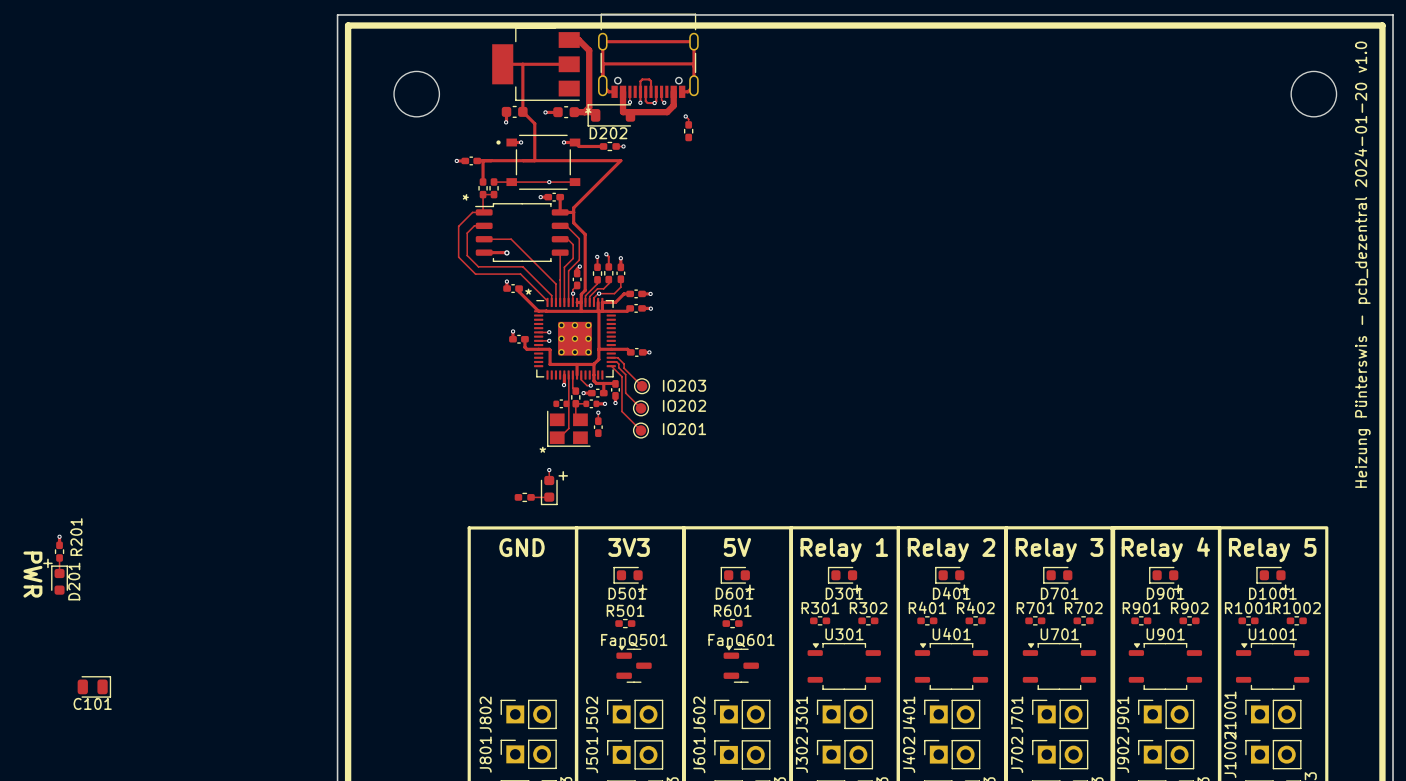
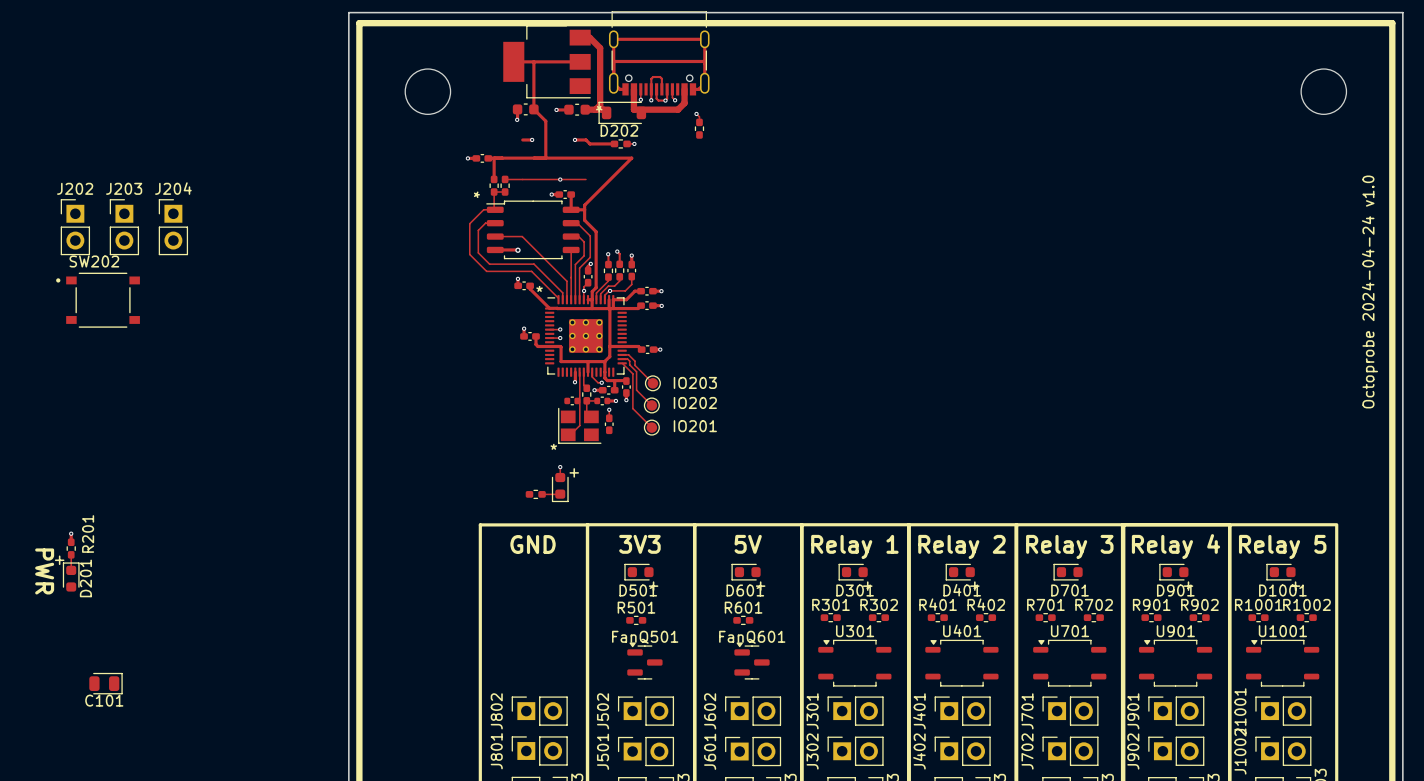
part: (538, 162) -> none
J202: none -> (75, 227)
J203: none -> (124, 227)
J204: none -> (173, 227)
text: Heizung Pünterswis - pcb_dezentral 2024-01-20 v1.0 (1362, 264) -> none
text: none -> Octoprobe 2024-04-24 v1.0 (1369, 291)
SW202: none -> (98, 300)

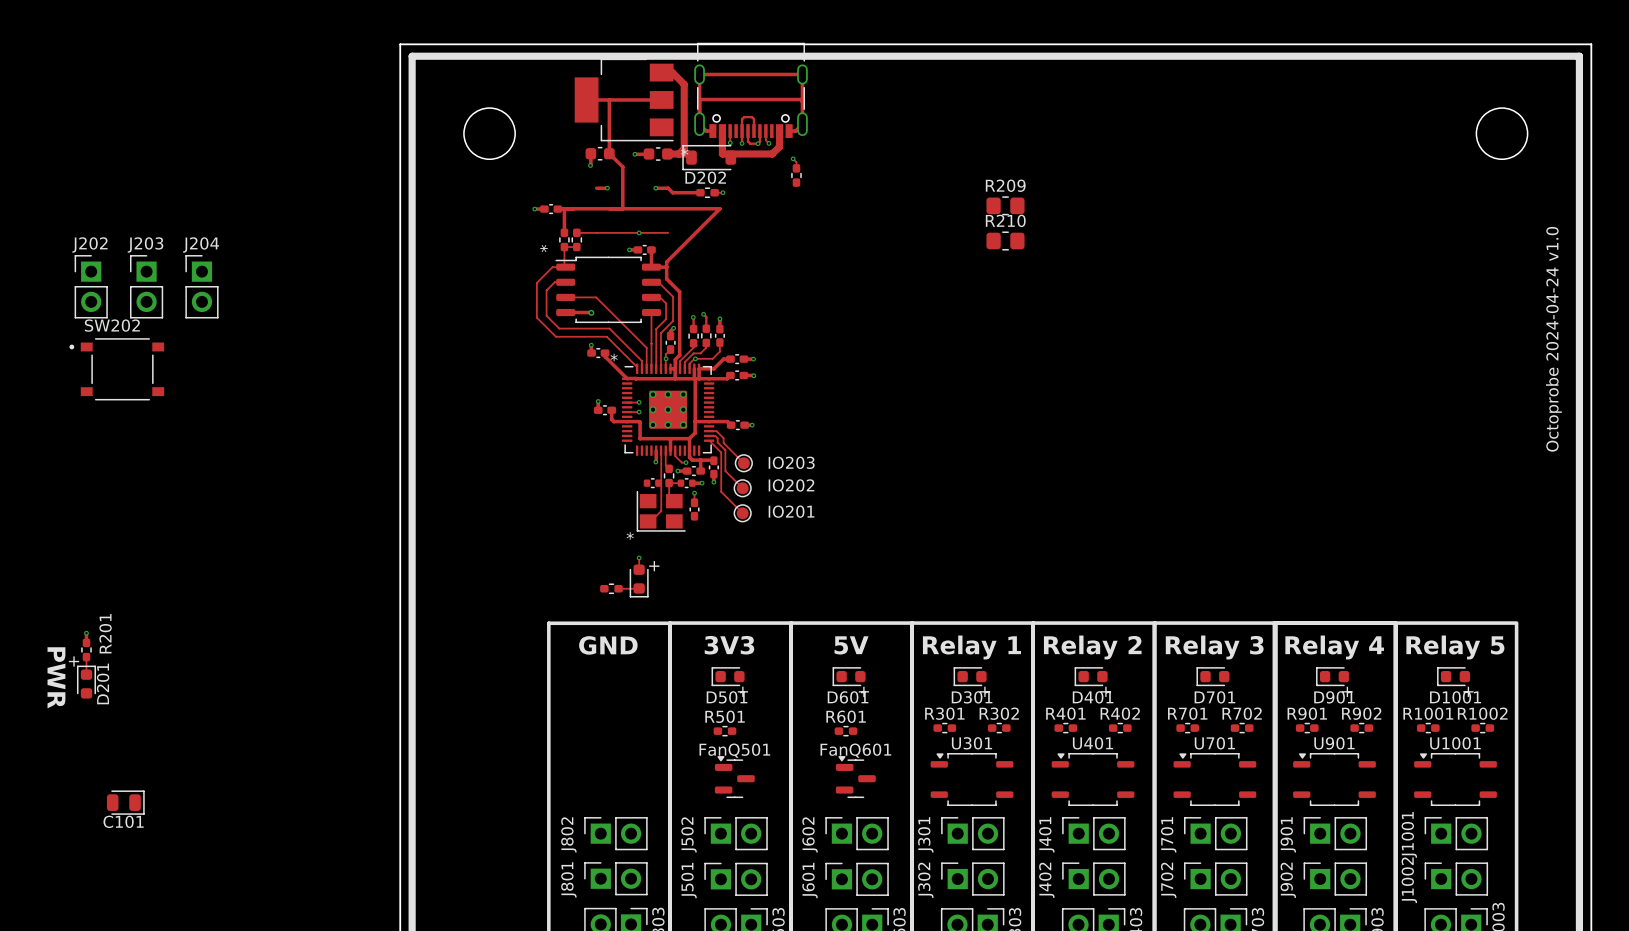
R209: none -> (1005, 205)
R210: none -> (1005, 240)

